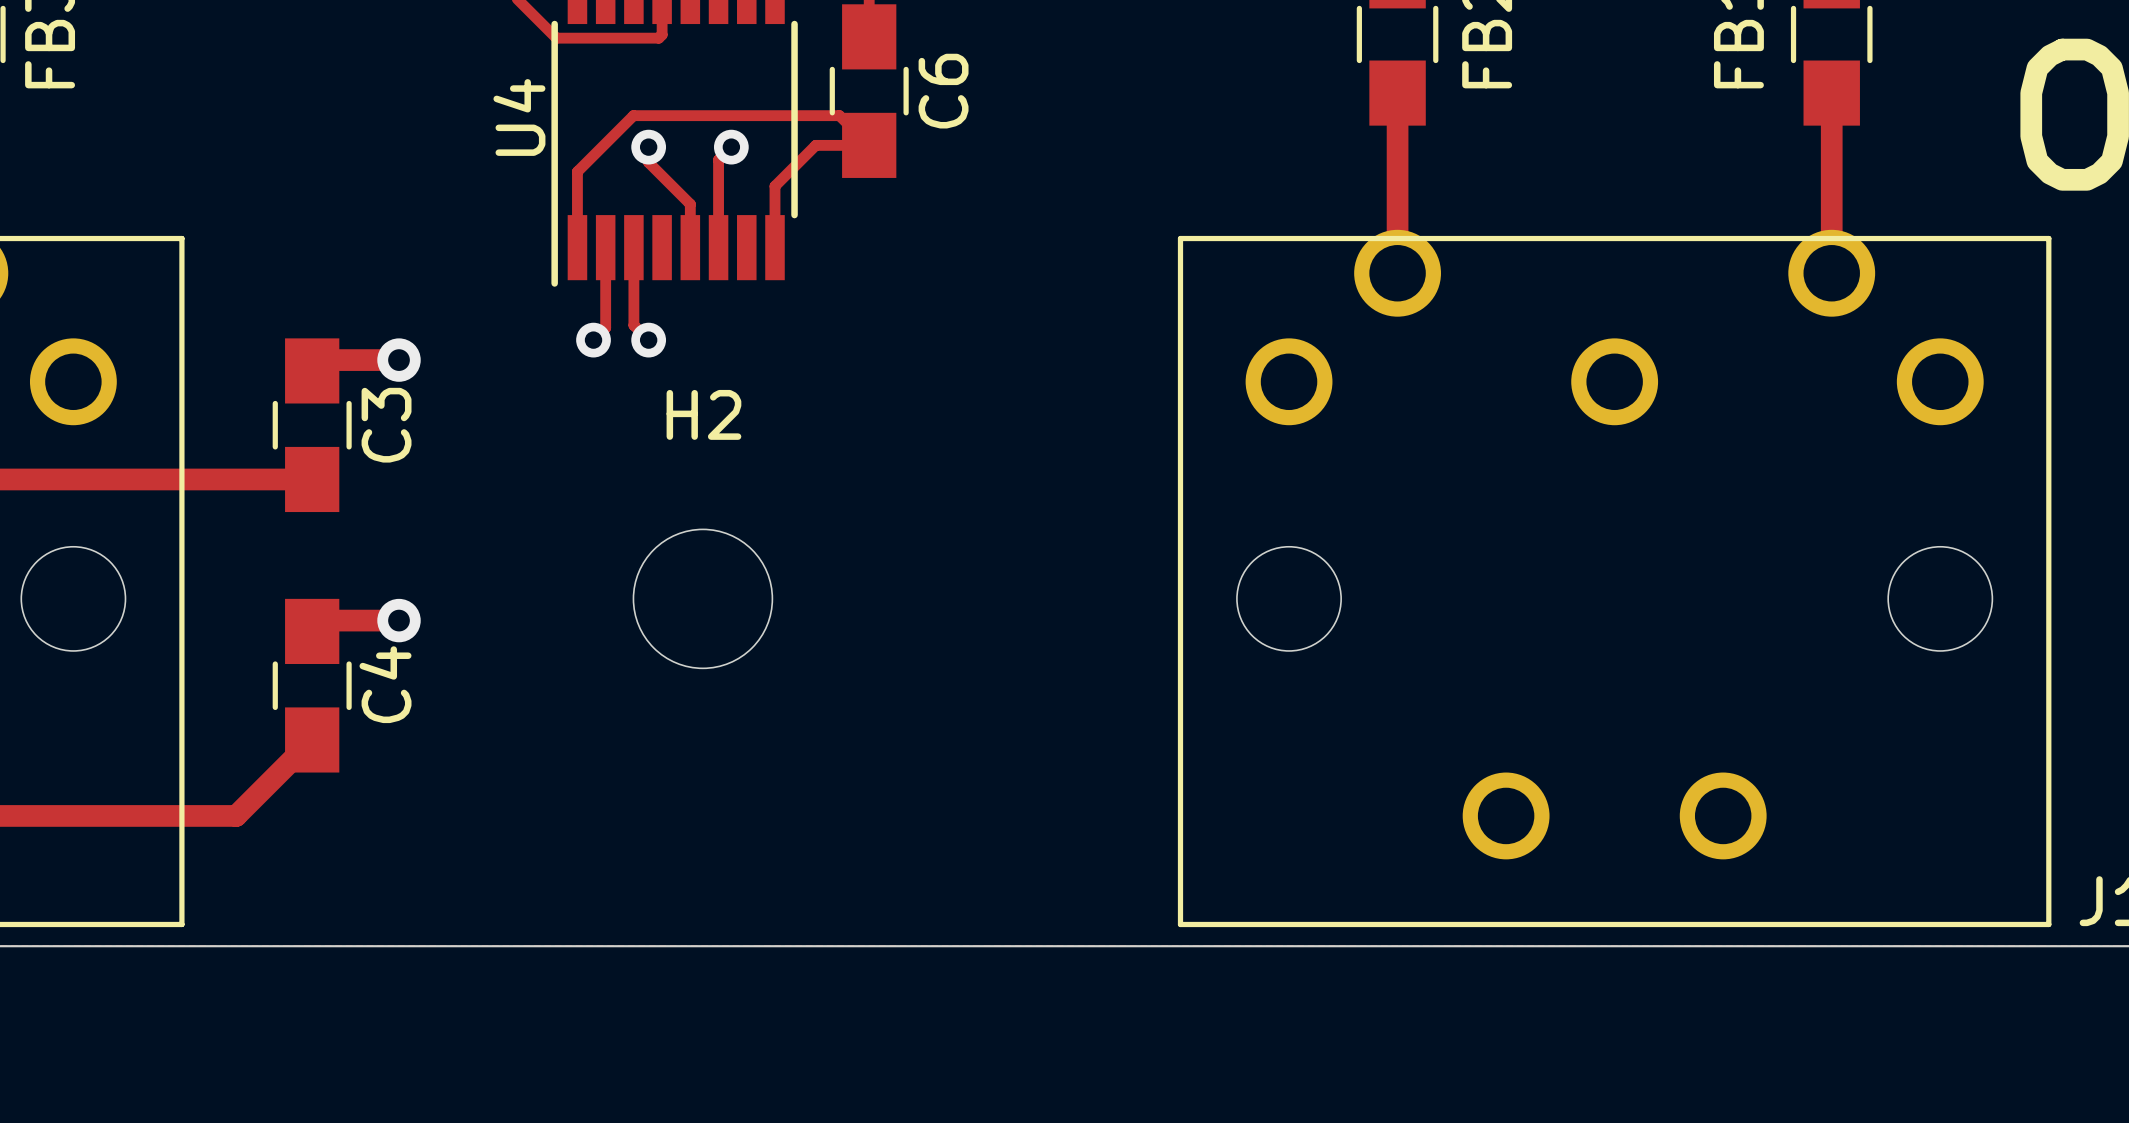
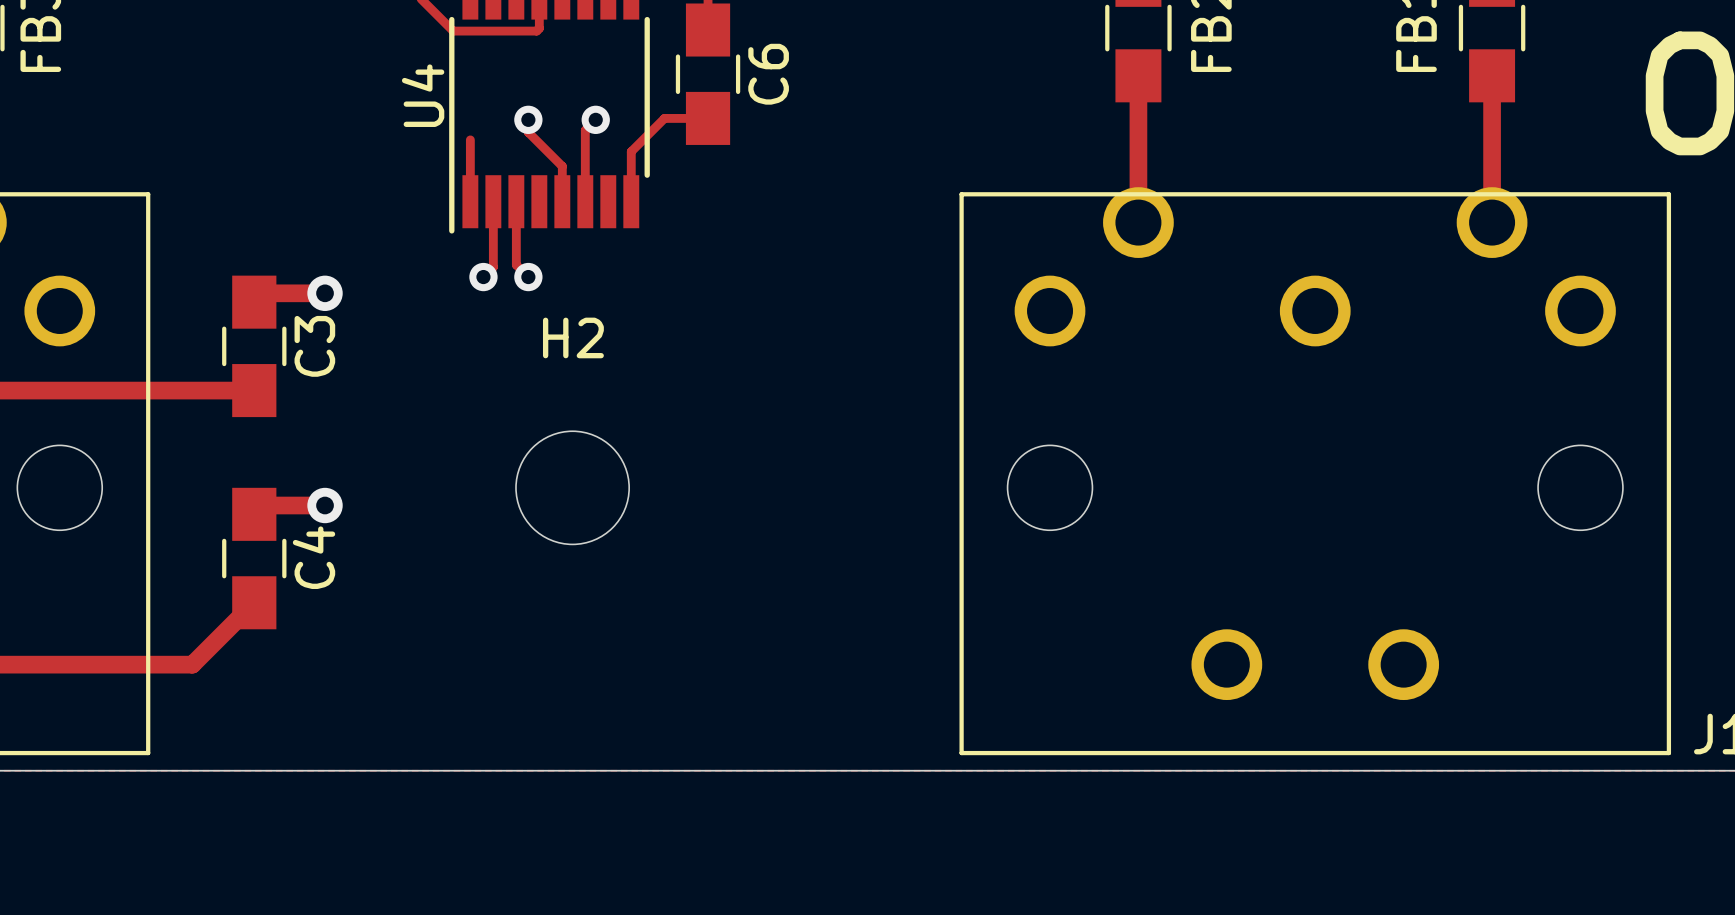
track: (869, 145) (839, 115) (633, 115) (577, 171) -> none

